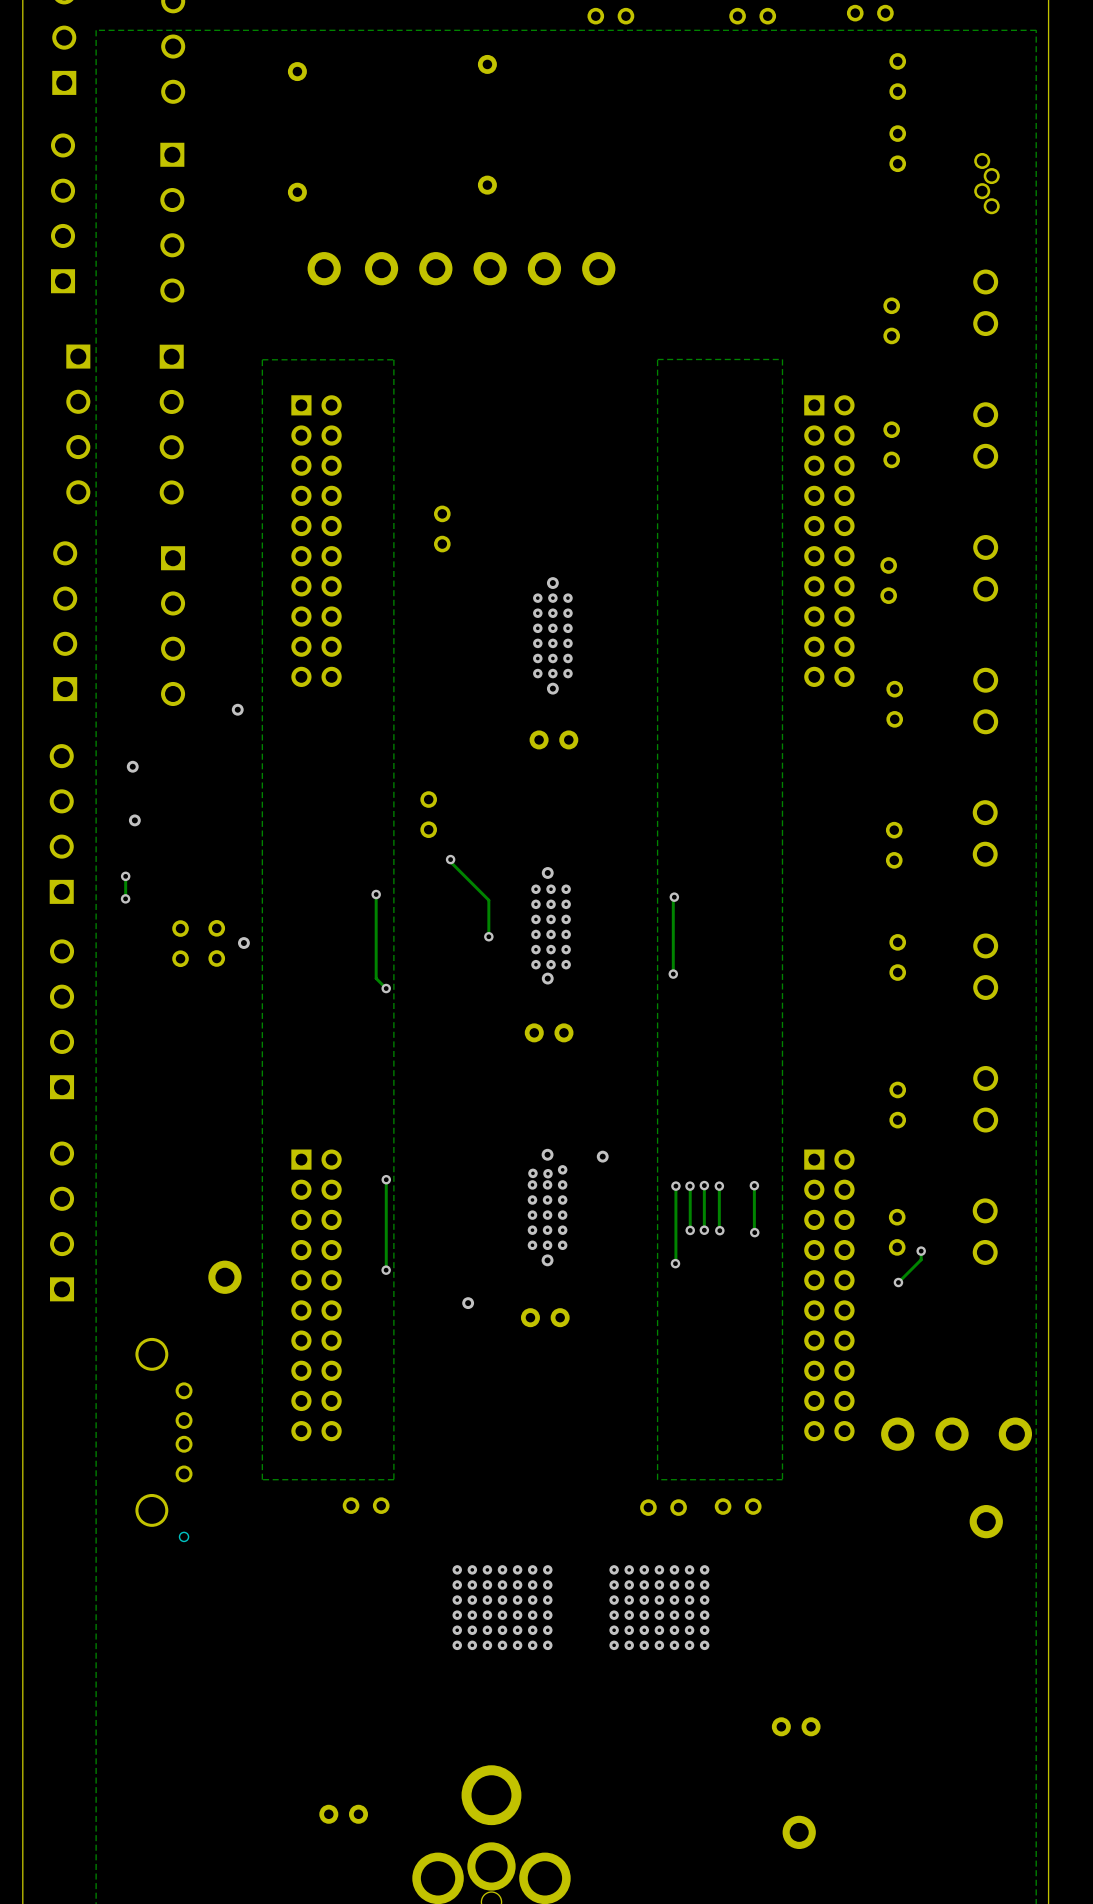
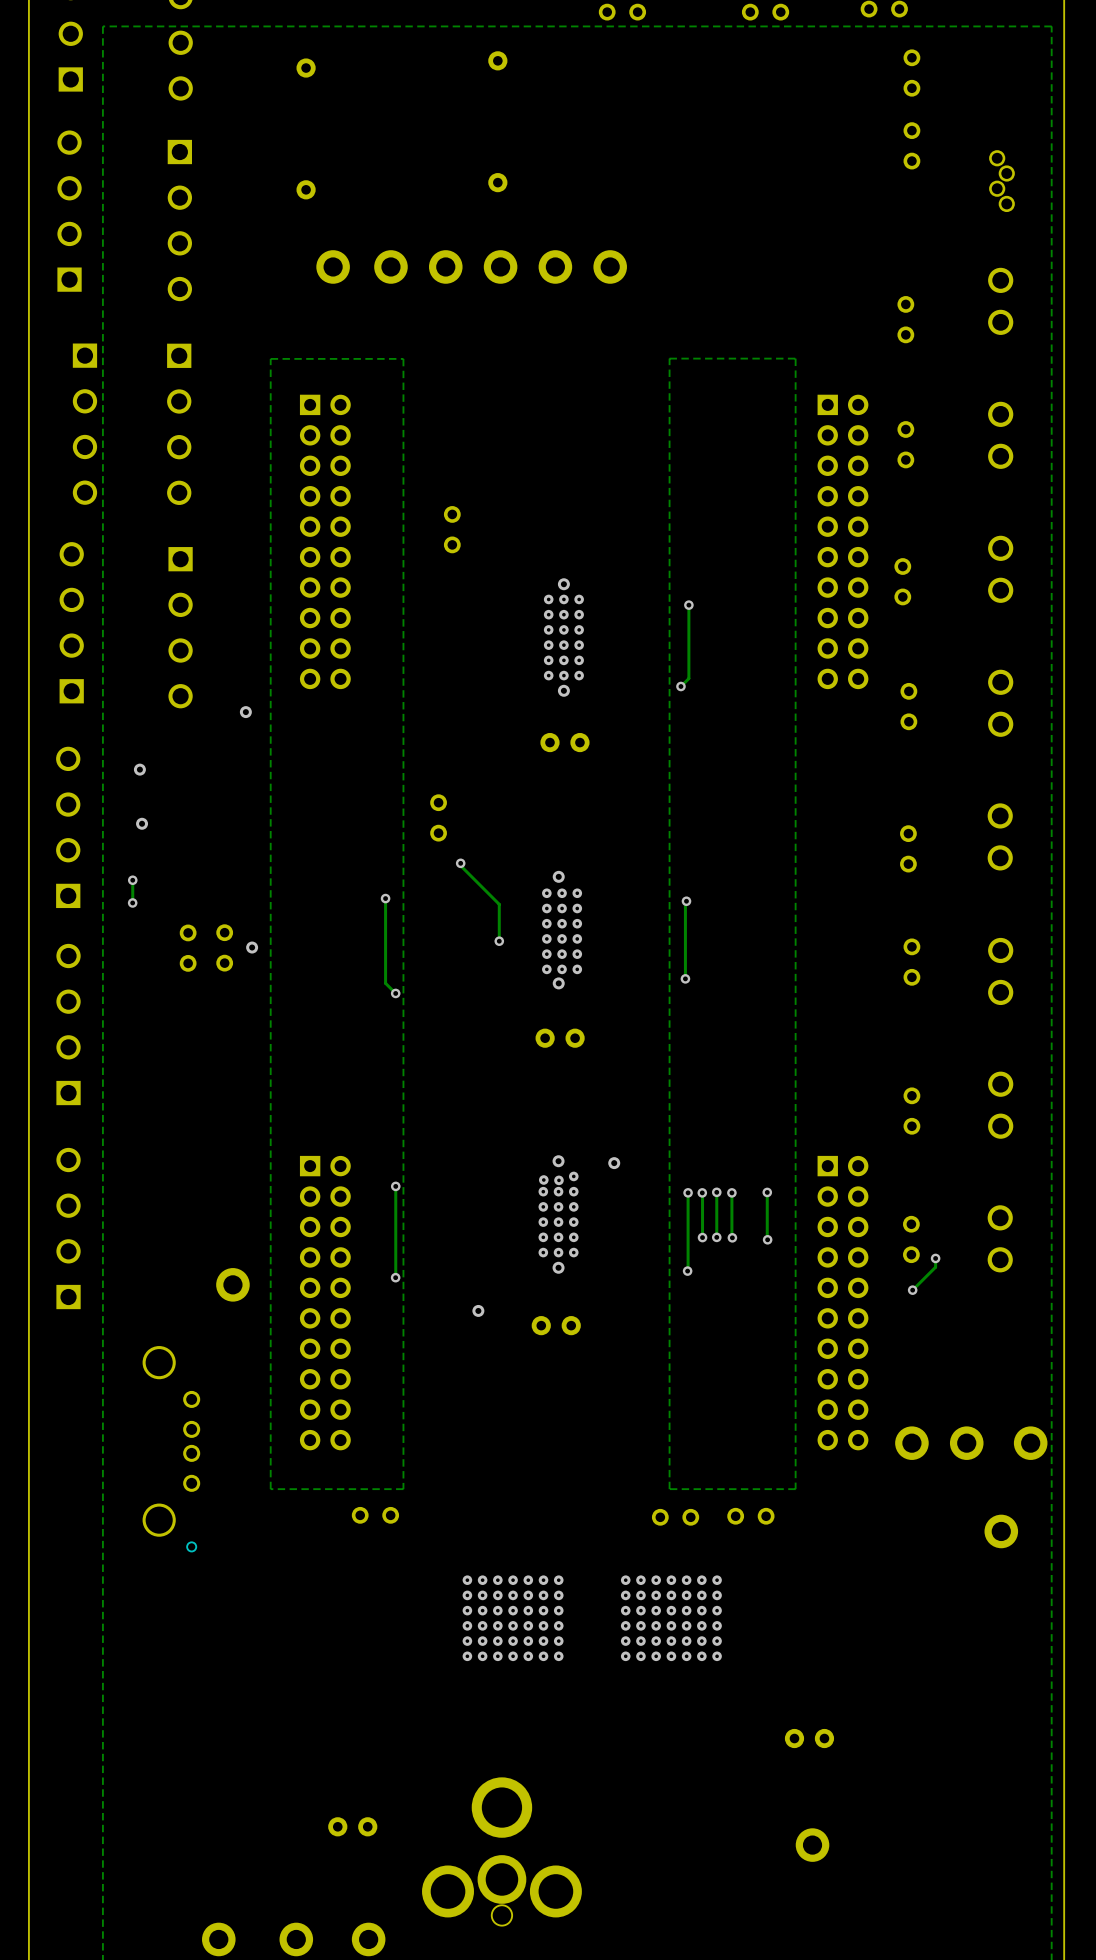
track: none -> (688, 605) (688, 678) (680, 686)
via: none -> (688, 605)
via: none -> (680, 686)

